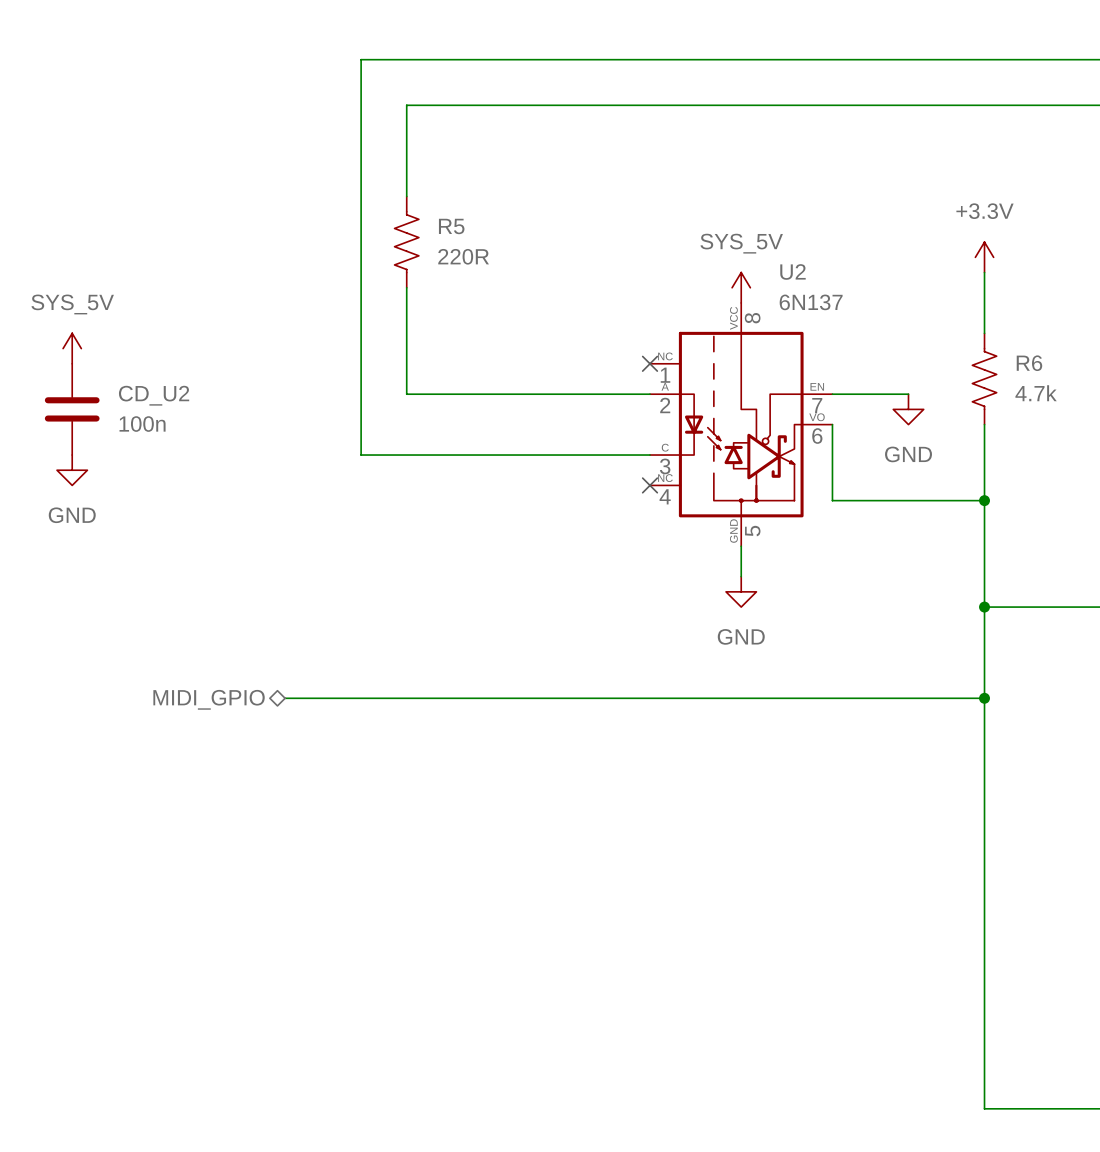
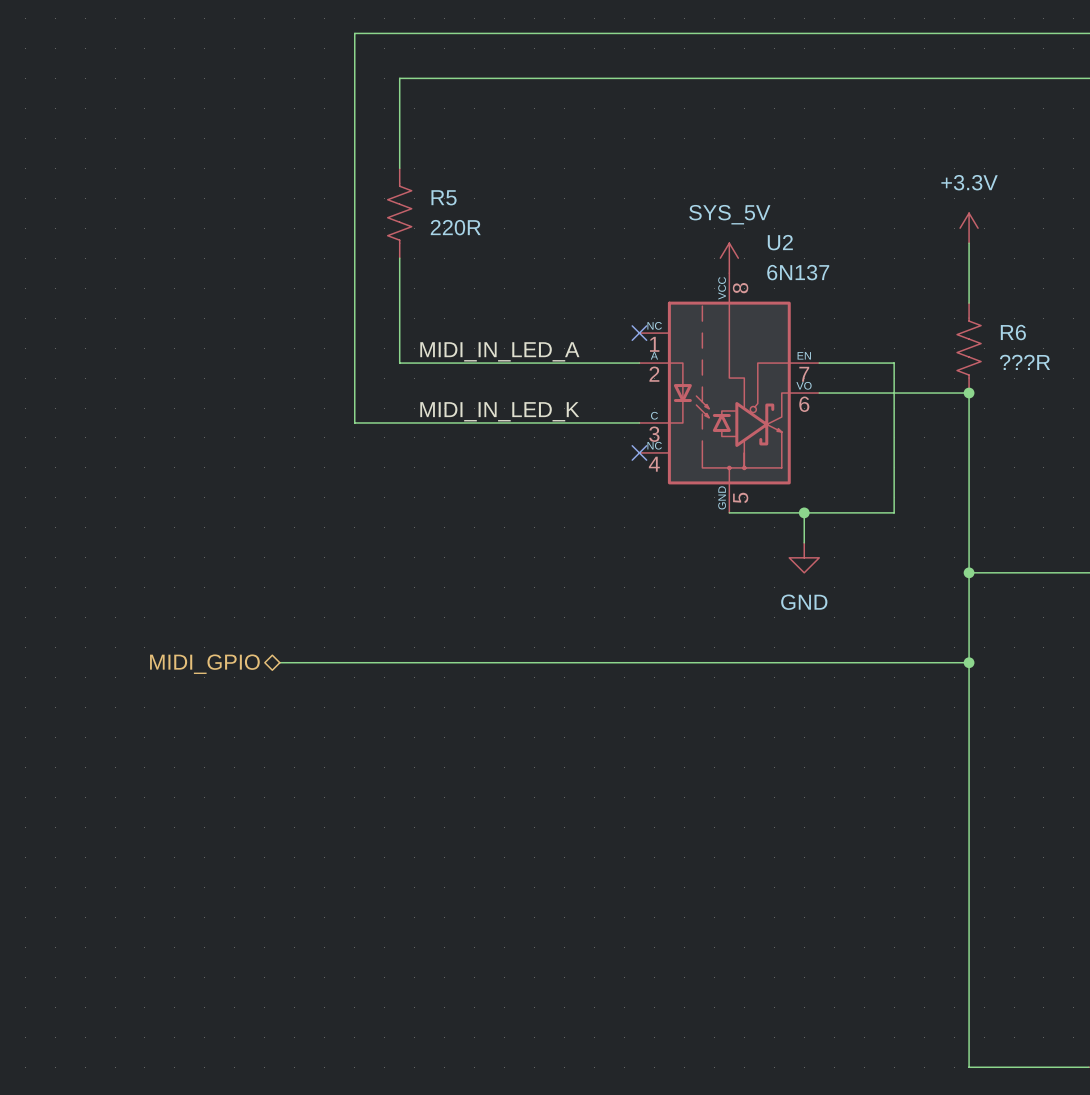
power symbol: SYS_5V (72, 348) -> none
label: none -> MIDI_IN_LED_A (499, 351)
R6 value: 4.7k (1036, 393) -> ???R (1025, 362)
CD_U2: 100n (72, 409) -> none
power symbol: GND (908, 409) -> none
wire: (832, 424) (832, 500) (984, 500) -> (819, 393) (969, 393)
junction: none -> (969, 393)
label: none -> MIDI_IN_LED_K (499, 411)
power symbol: GND (72, 470) -> none
junction: (984, 500) -> none
wire: (741, 546) (741, 576) -> (729, 512) (894, 512) (894, 363)
wire: none -> (804, 512) (804, 542)
junction: none -> (804, 512)
power symbol position: GND (741, 591) -> GND (804, 557)

